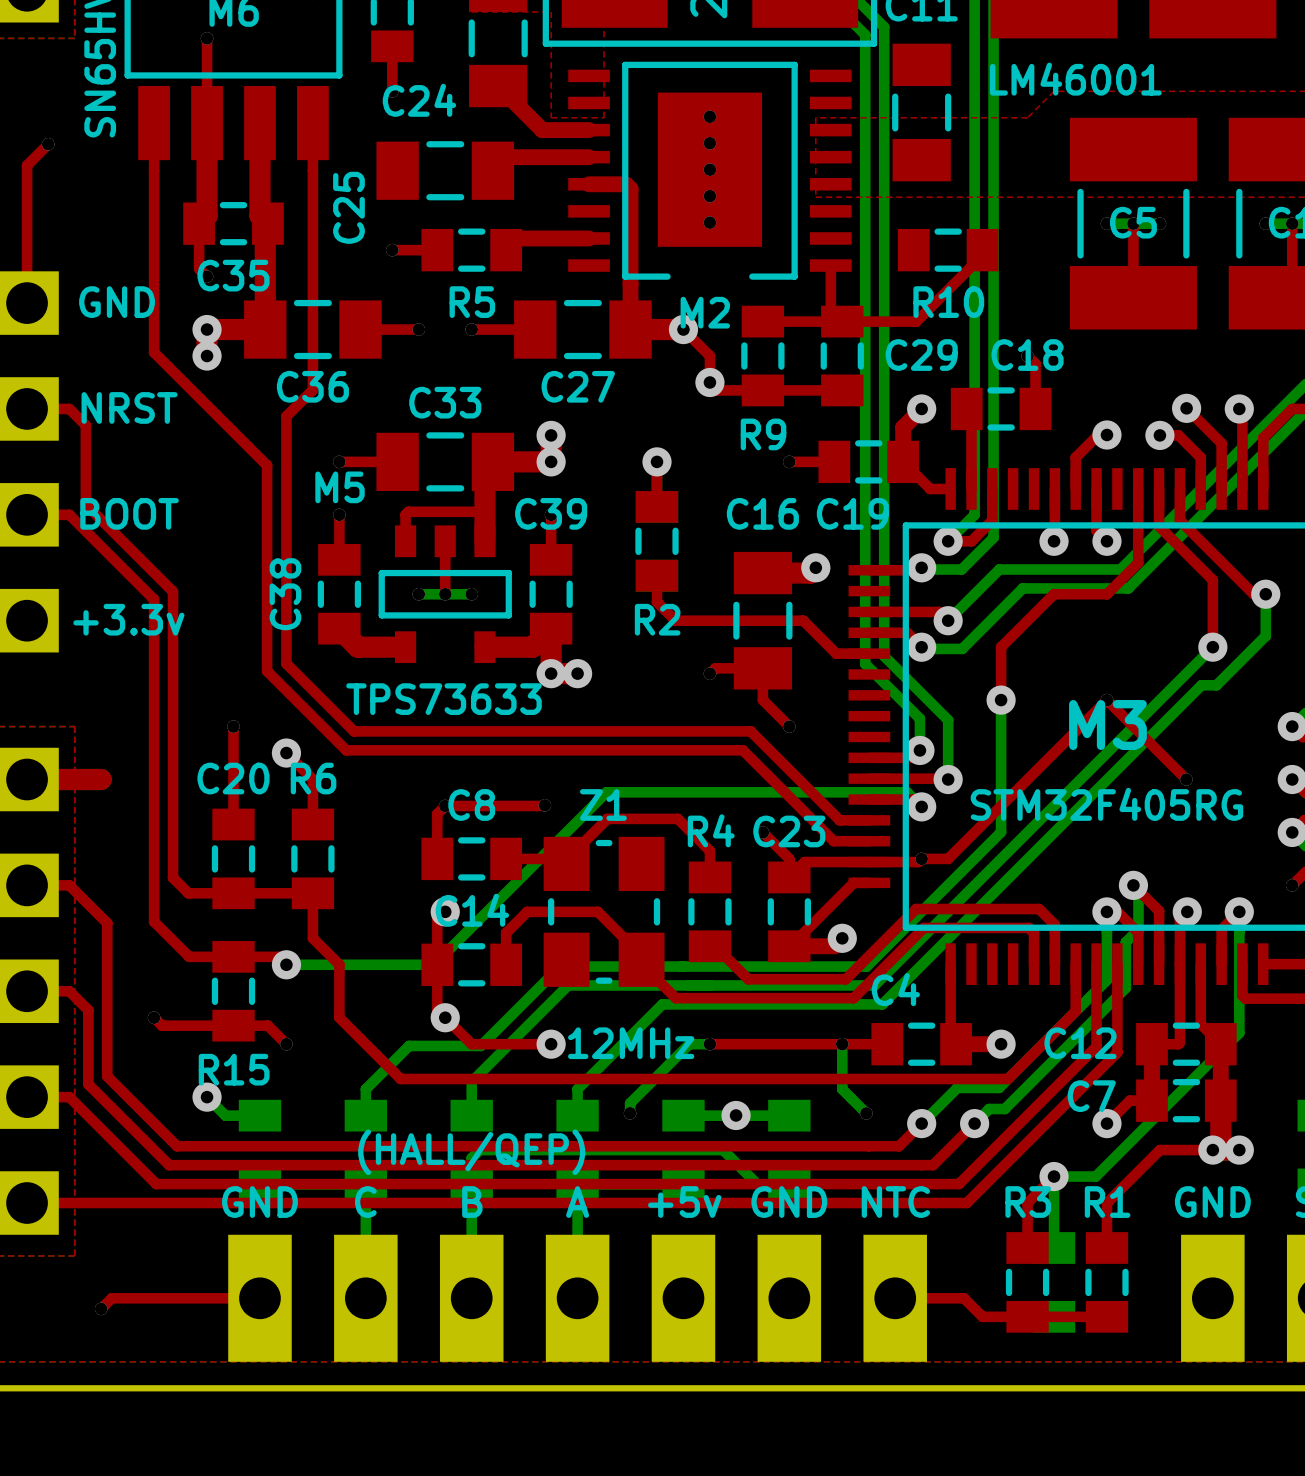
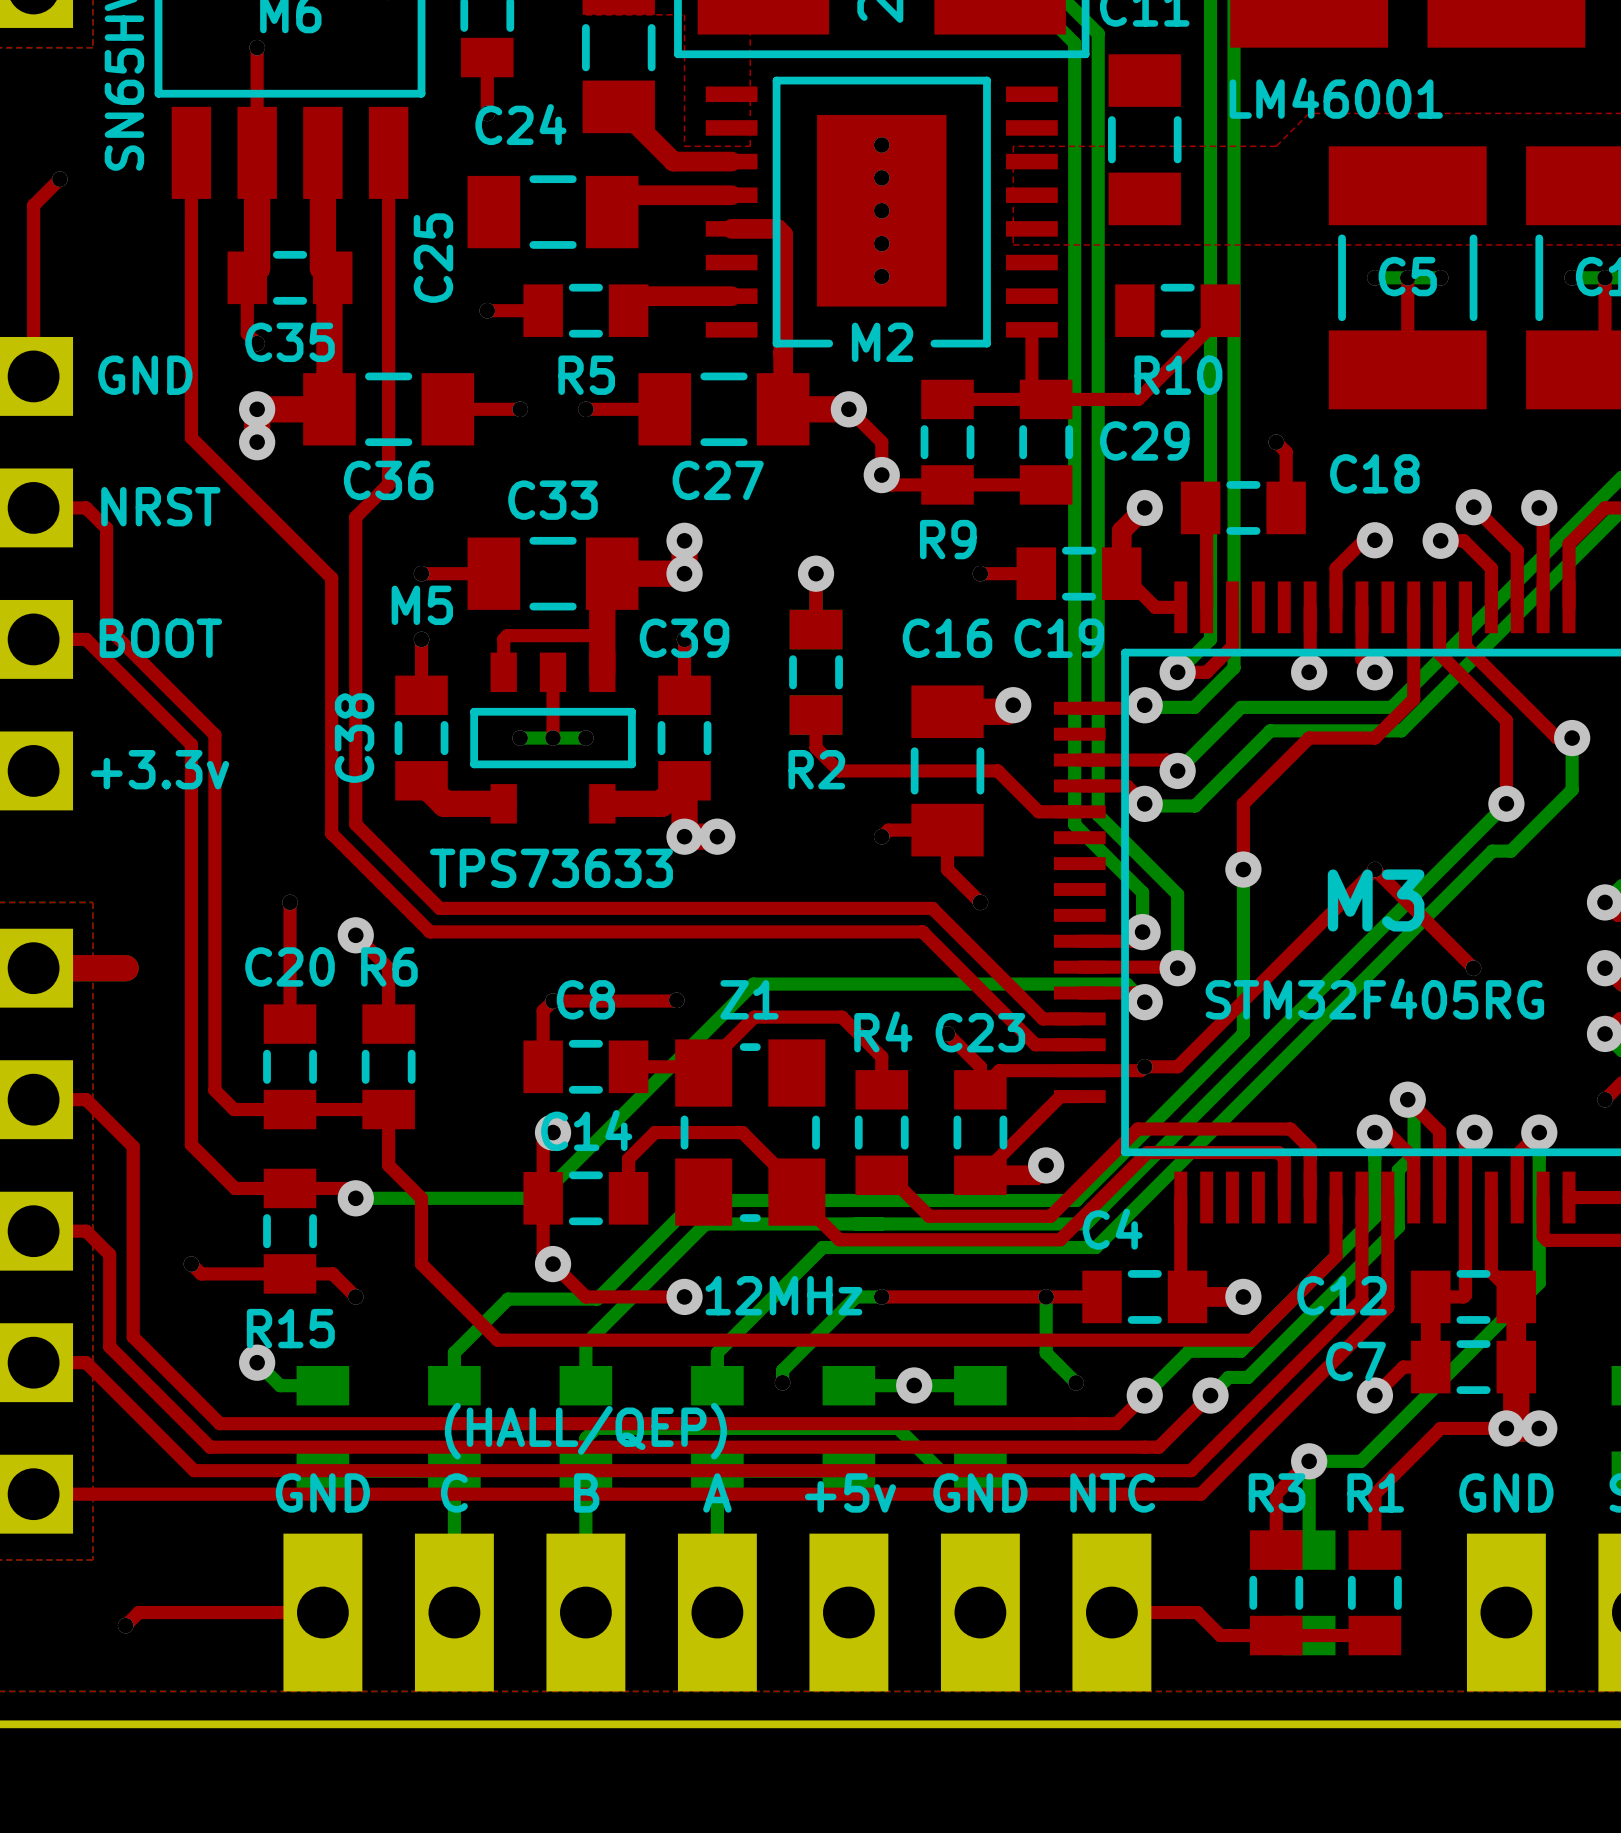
M2 name position: M2 (705, 312) -> M2 (882, 342)
C18 name position: C18 (1027, 355) -> C18 (1374, 473)

